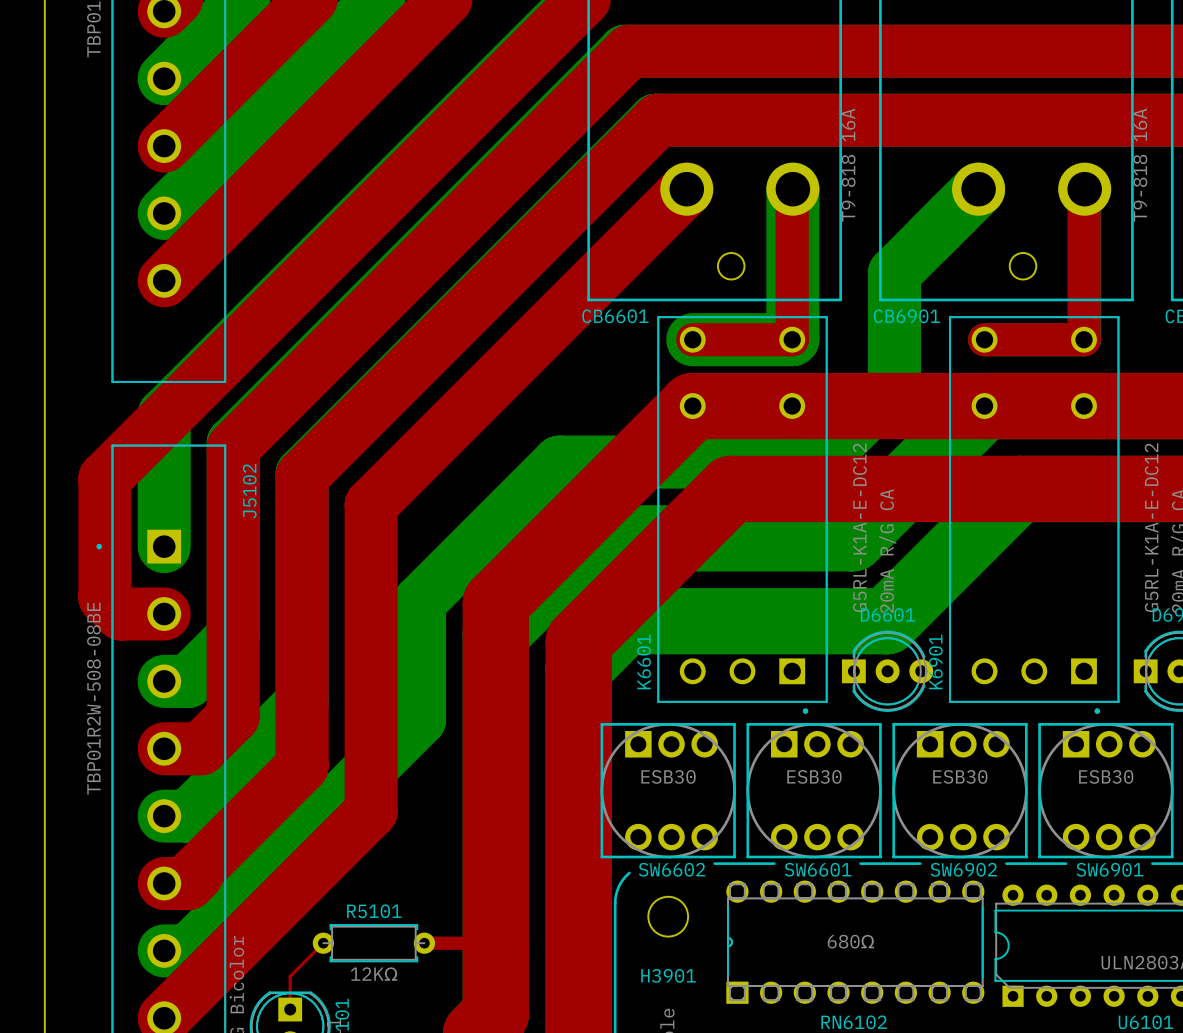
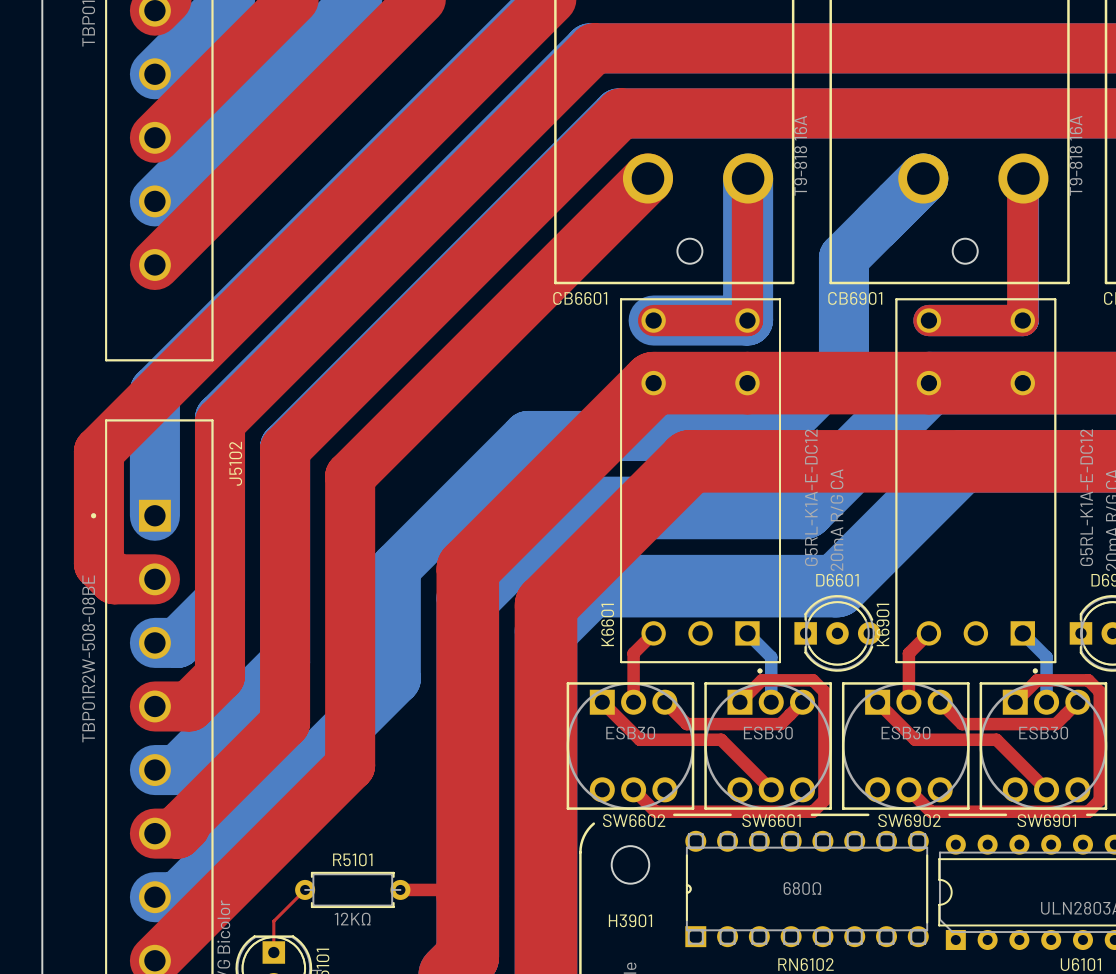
top track: none -> (653, 633) (633, 653) (633, 702)
bottom track: none -> (747, 633) (771, 657) (771, 702)
top track: none -> (928, 633) (908, 653) (908, 702)
bottom track: none -> (1022, 633) (1046, 657) (1046, 702)
top track: none -> (602, 702) (639, 739) (721, 739) (771, 789)
top track: none -> (664, 702) (686, 724) (780, 724) (802, 702)
top track: none -> (739, 702) (761, 680) (813, 680) (824, 691) (824, 800) (813, 811) (655, 811) (633, 789)
top track: none -> (877, 702) (915, 739) (996, 739) (1046, 789)
top track: none -> (940, 702) (962, 724) (1055, 724) (1077, 702)
top track: none -> (1015, 702) (1037, 680) (1088, 680) (1099, 691) (1099, 800) (1088, 811) (930, 811) (908, 789)

